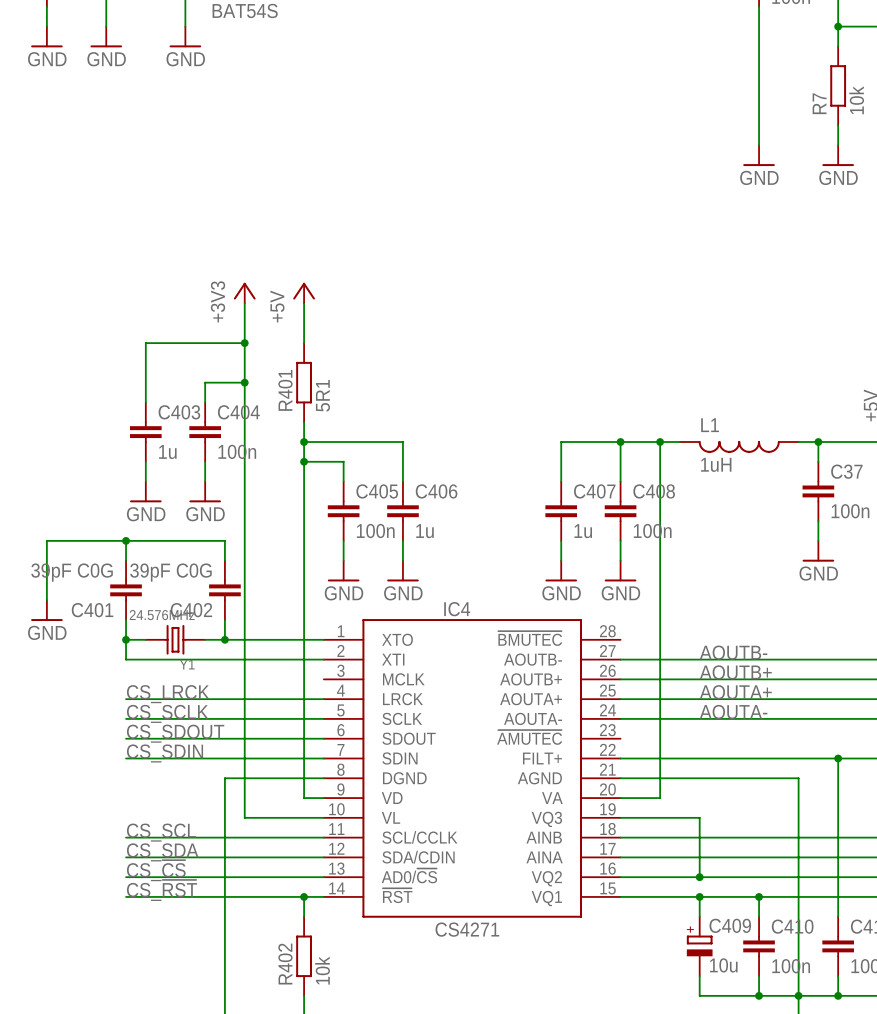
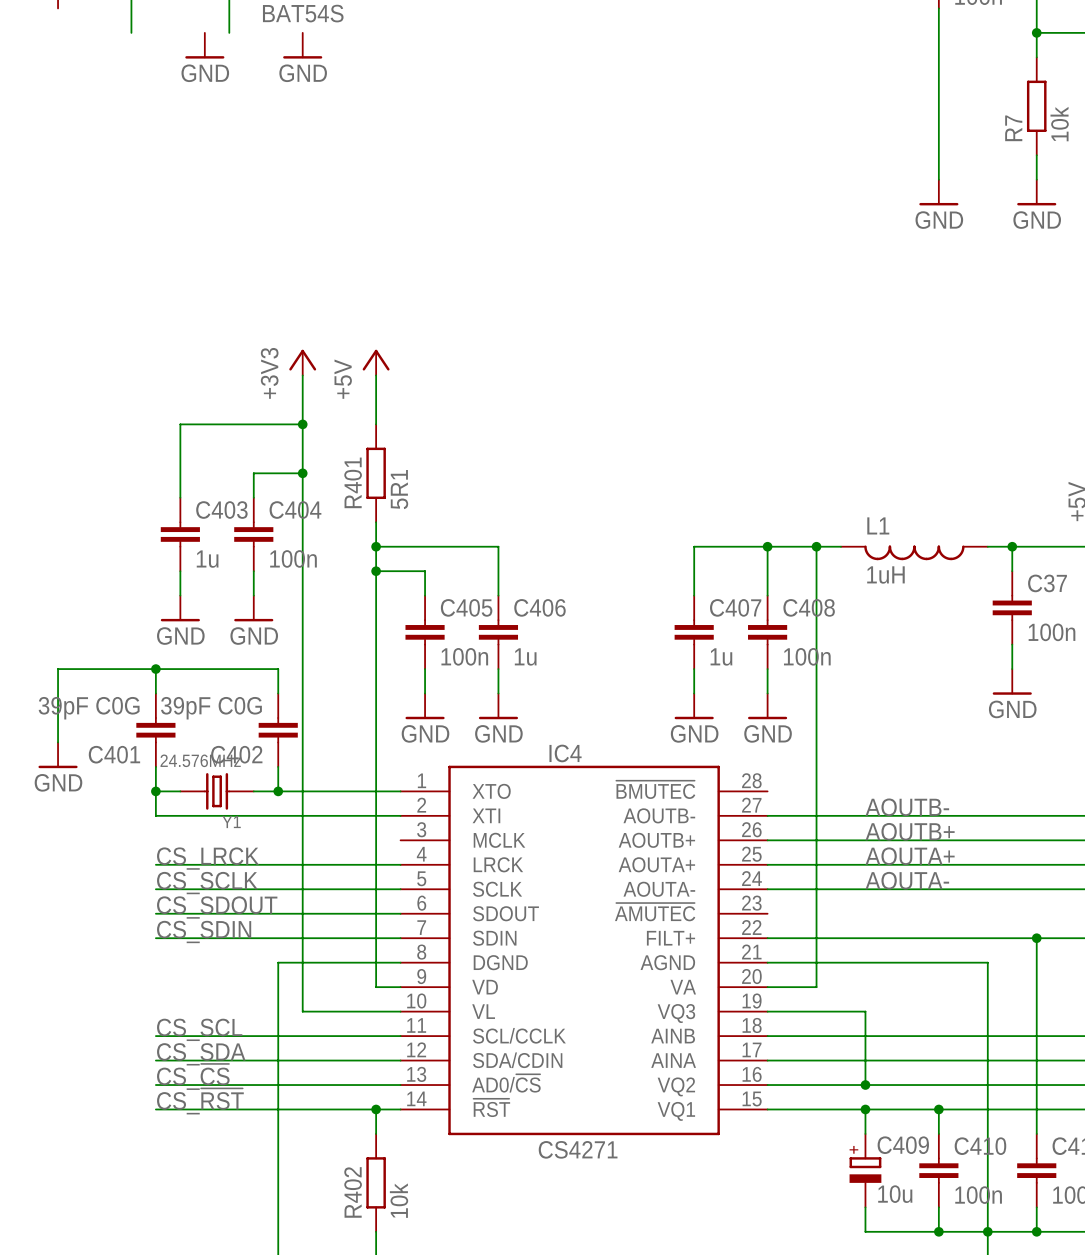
wire: (46, 6) (46, 26) -> none
power symbol: GND (46, 36) -> none
power symbol: GND (106, 36) -> none
power symbol position: GND (185, 36) -> GND (204, 45)
power symbol: none -> GND (302, 45)

